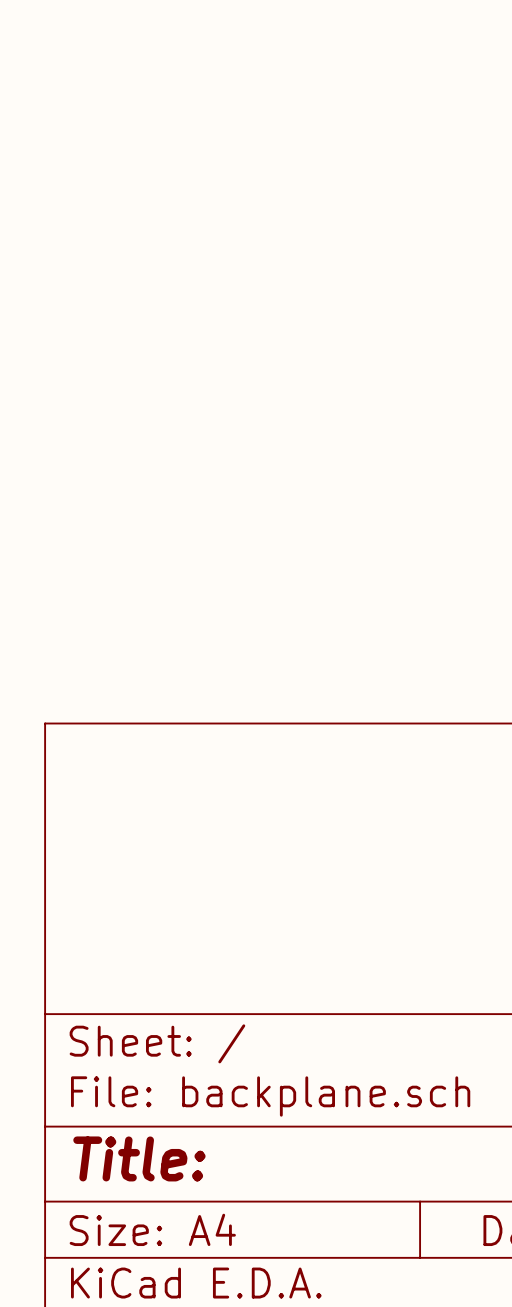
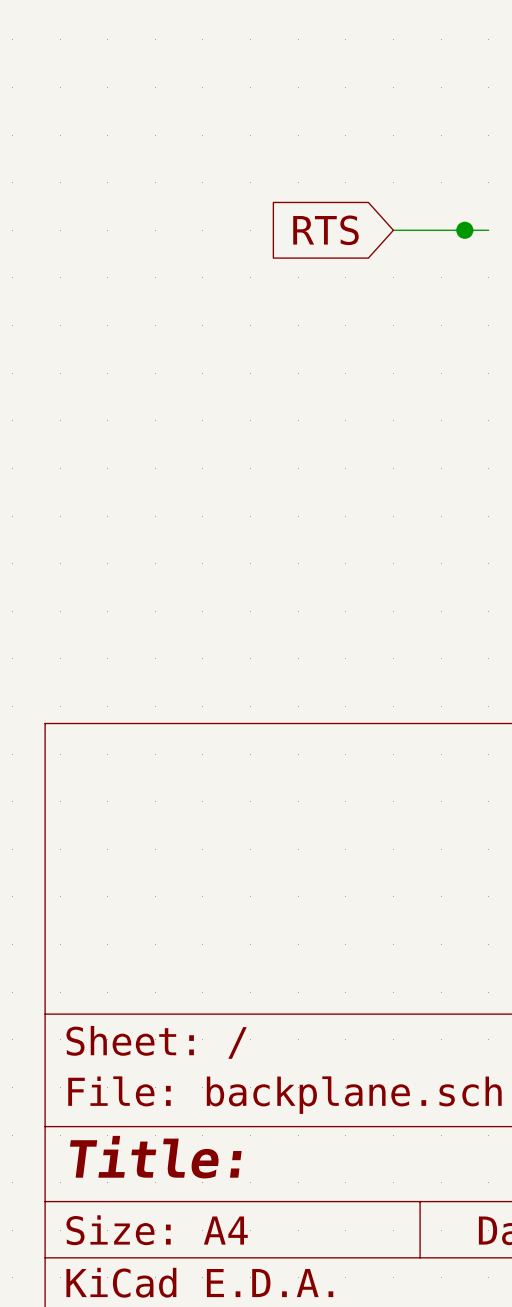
global label: none -> RTS (325, 230)
wire: none -> (393, 230) (488, 230)
junction: none -> (464, 230)

